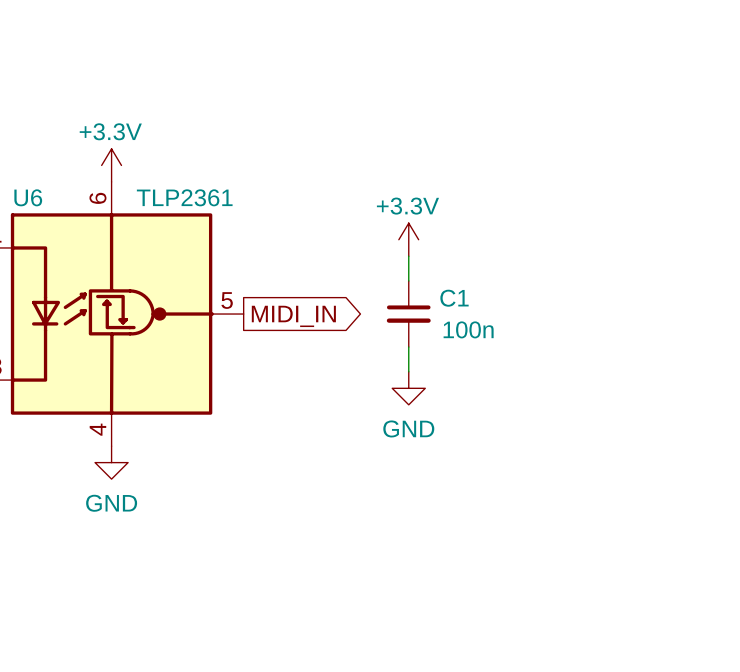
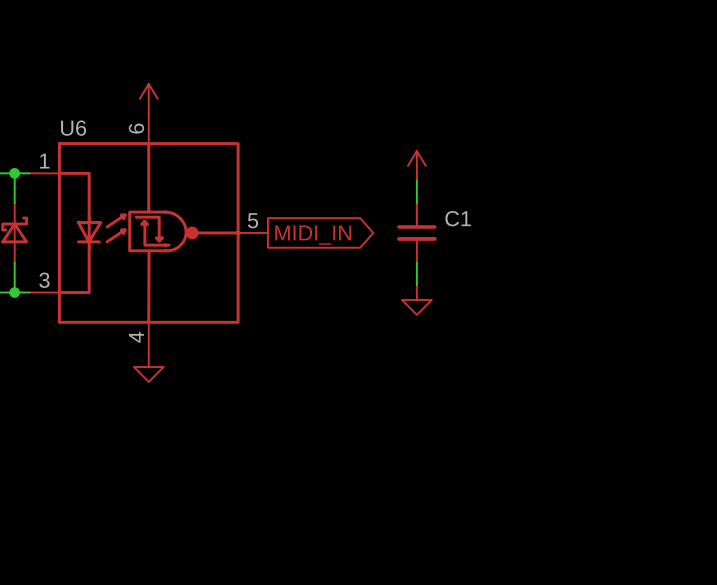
power symbol text: +3.3V (110, 131) -> none
U6 value: TLP2361 (184, 197) -> none
power symbol text: +3.3V (407, 206) -> none
C1 value: 100n (468, 329) -> none
power symbol text: GND (408, 428) -> none
power symbol text: GND (111, 503) -> none

